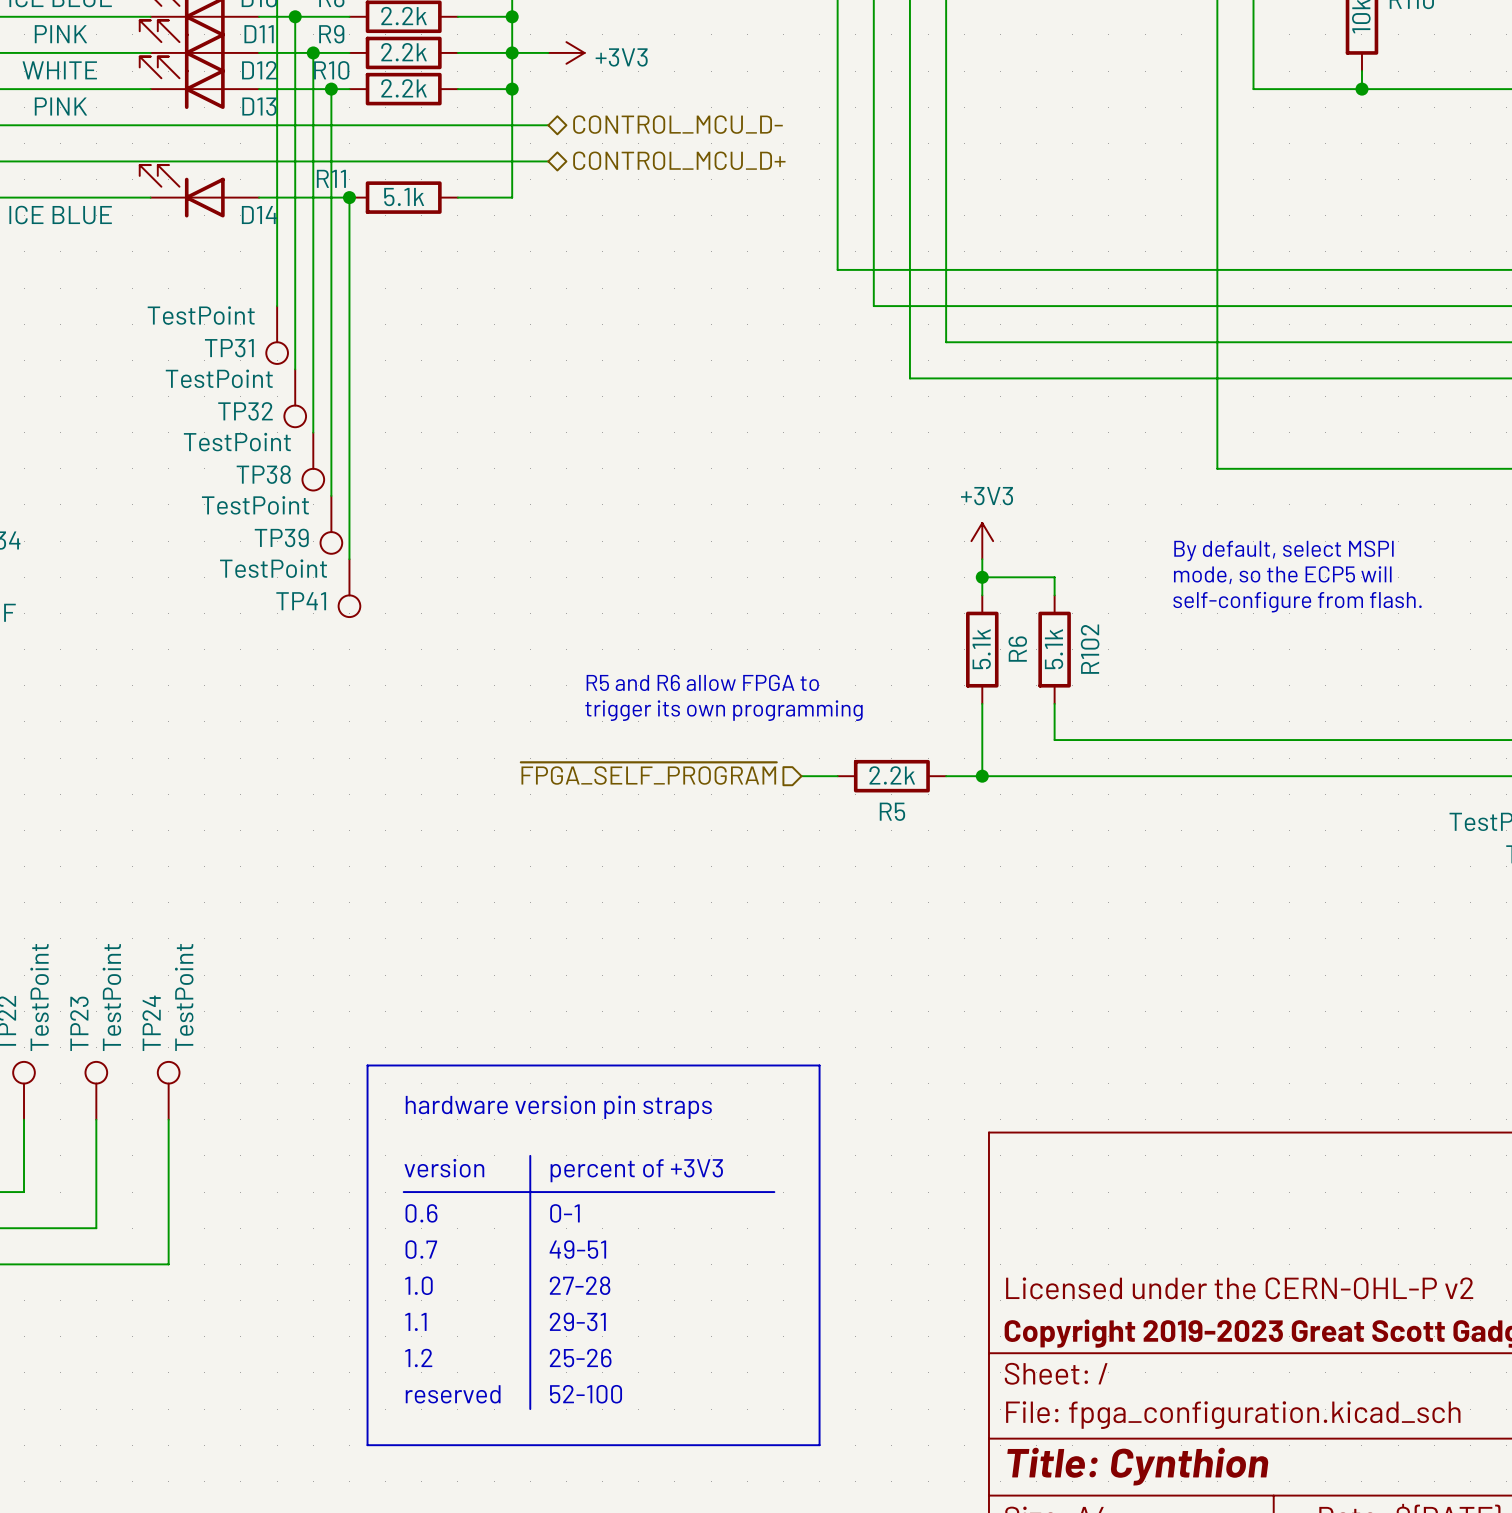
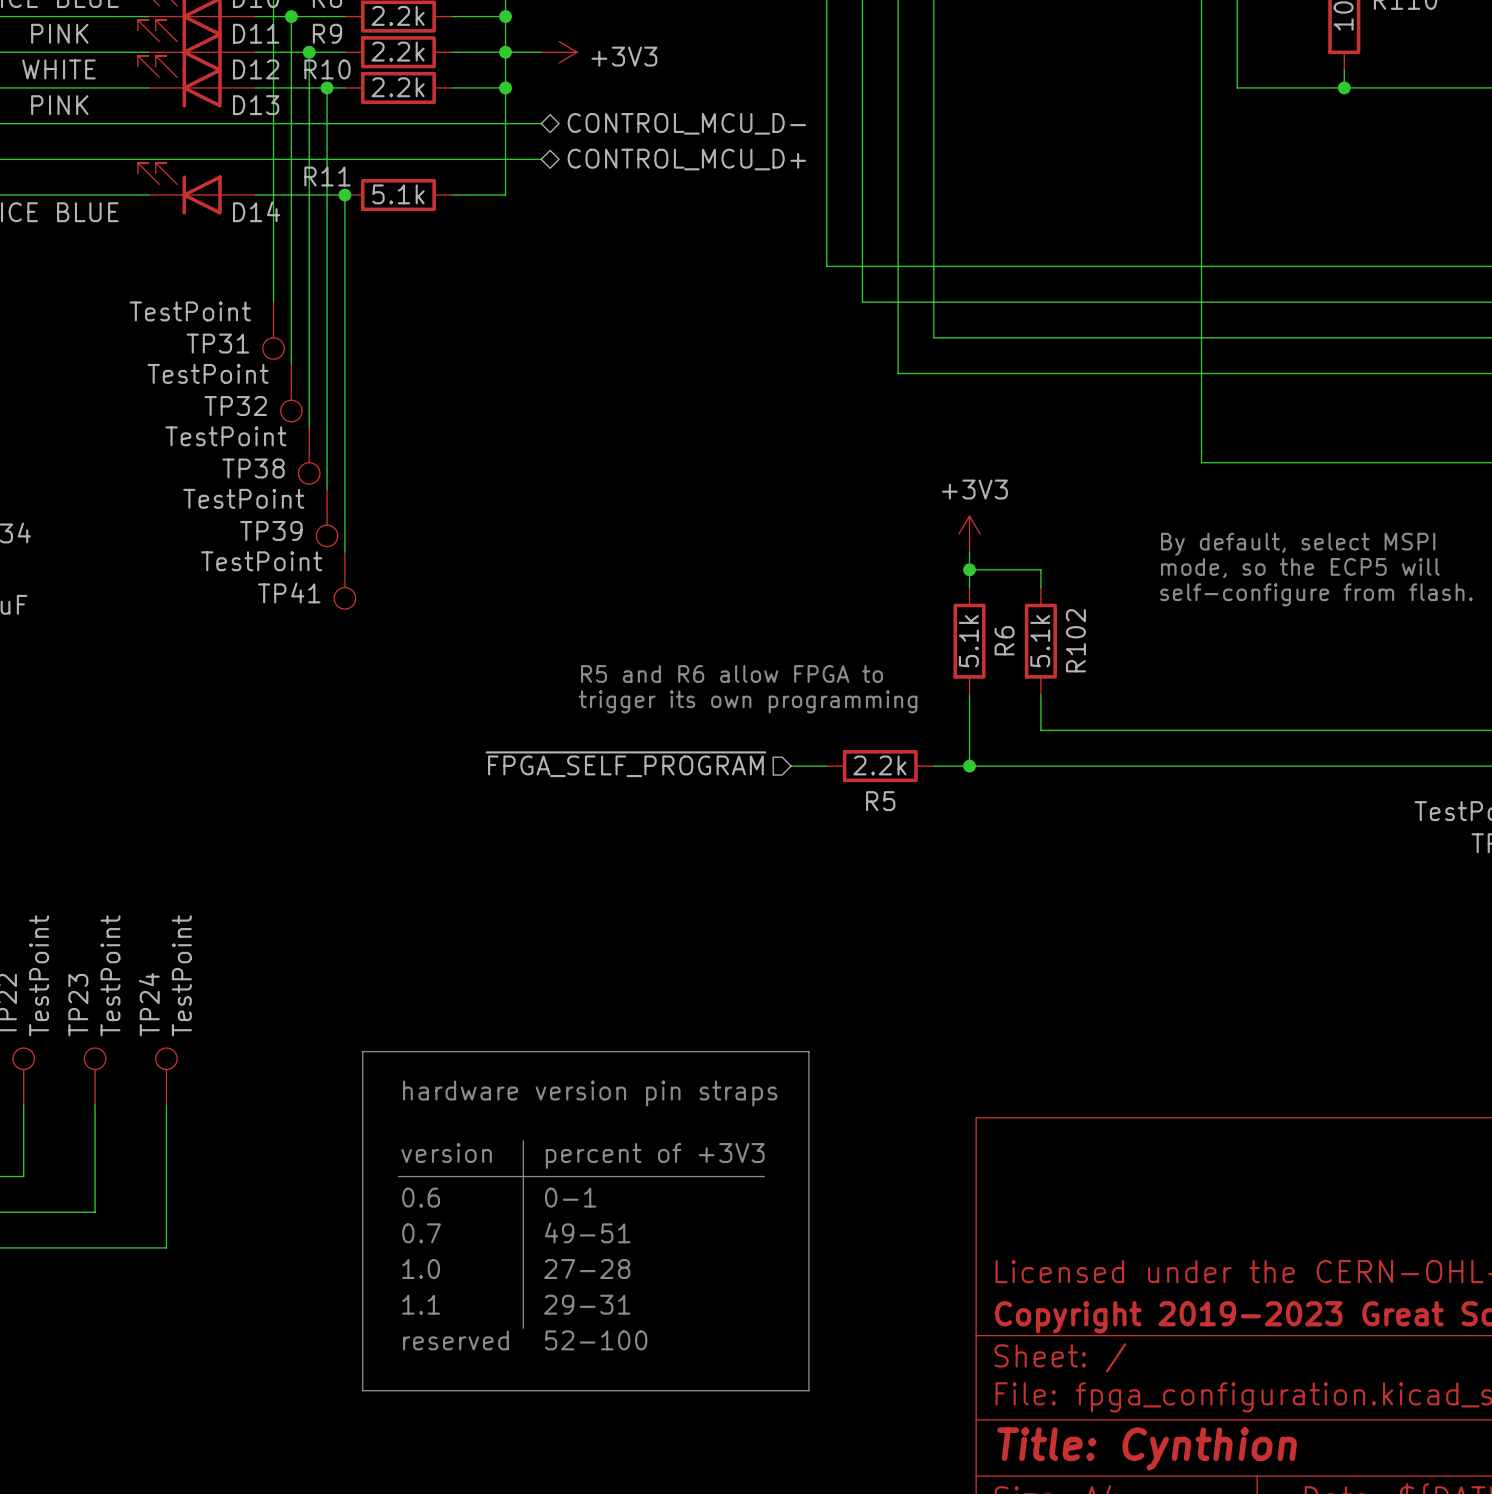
line: (530, 1345) (530, 1409) -> none
text: 1.2 (418, 1357) -> reserved (455, 1340)
text: 25-26 (580, 1358) -> 52-100 (596, 1340)
text: reserved (453, 1394) -> none
text: 52-100 (586, 1394) -> none
line: (367, 1409) (367, 1445) (819, 1445) (819, 1409) -> (362, 1390) (808, 1390)

